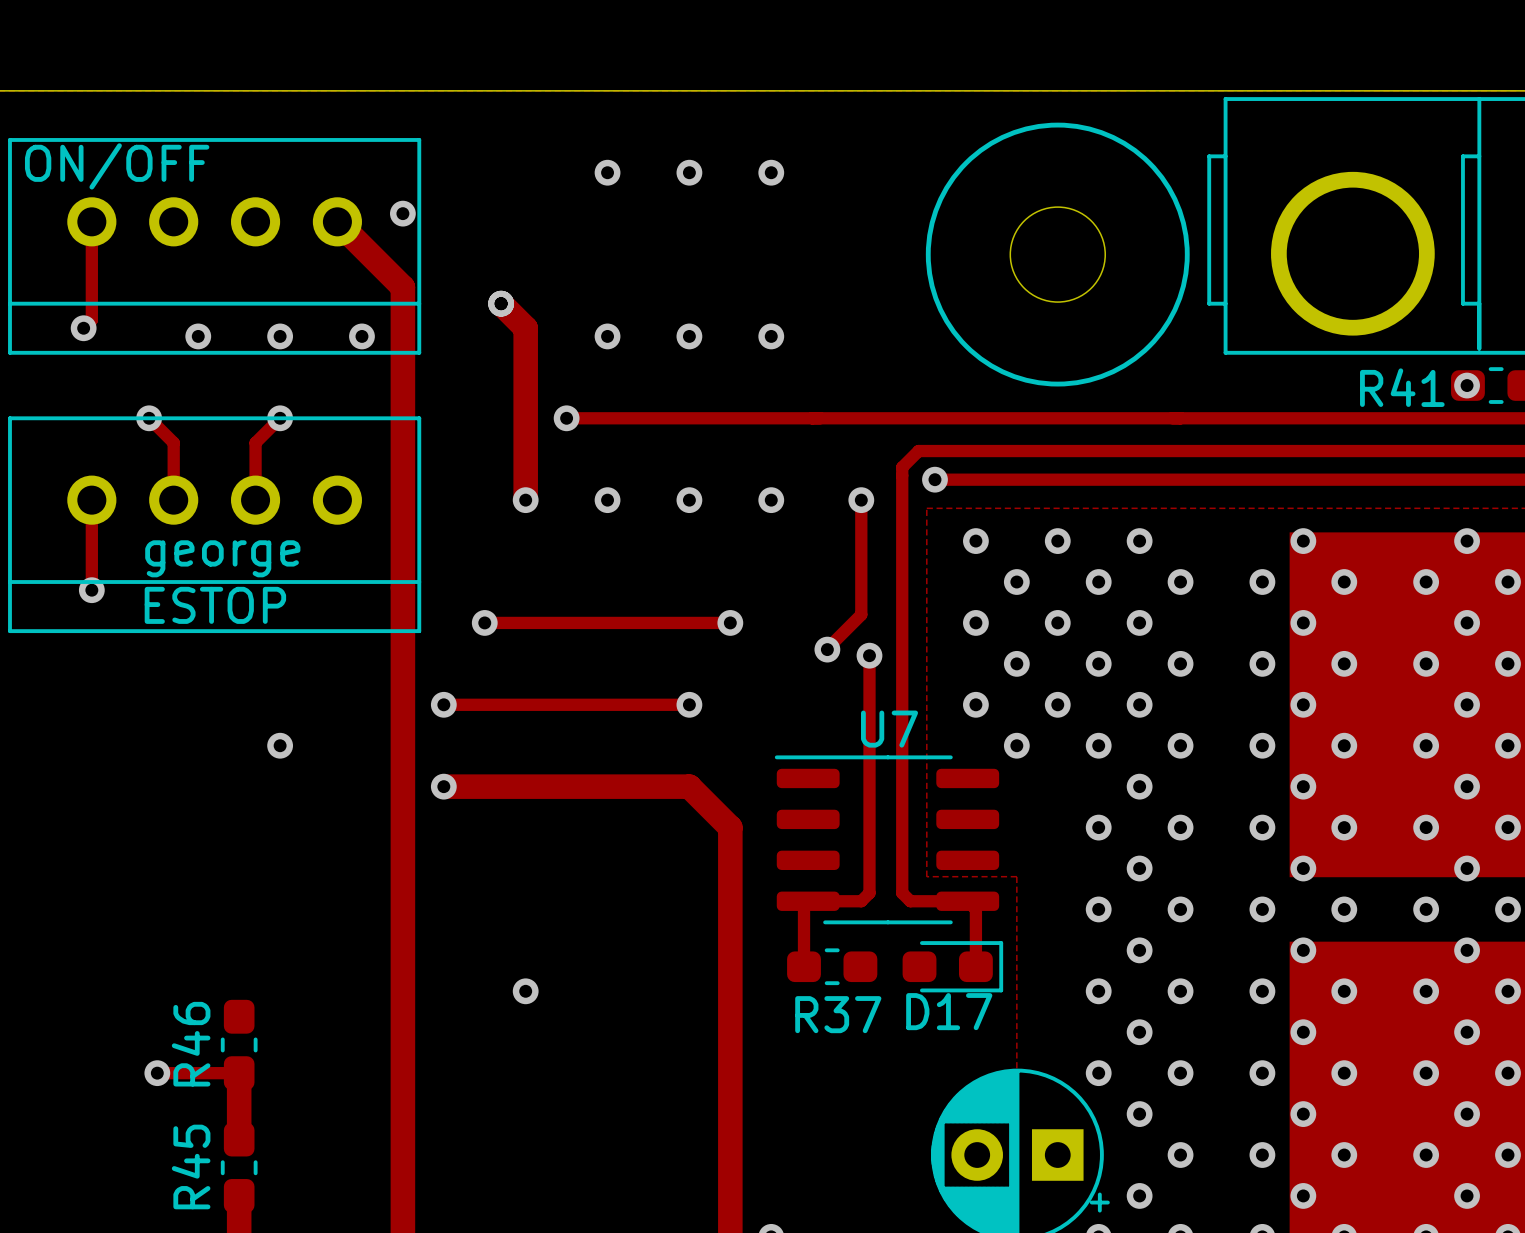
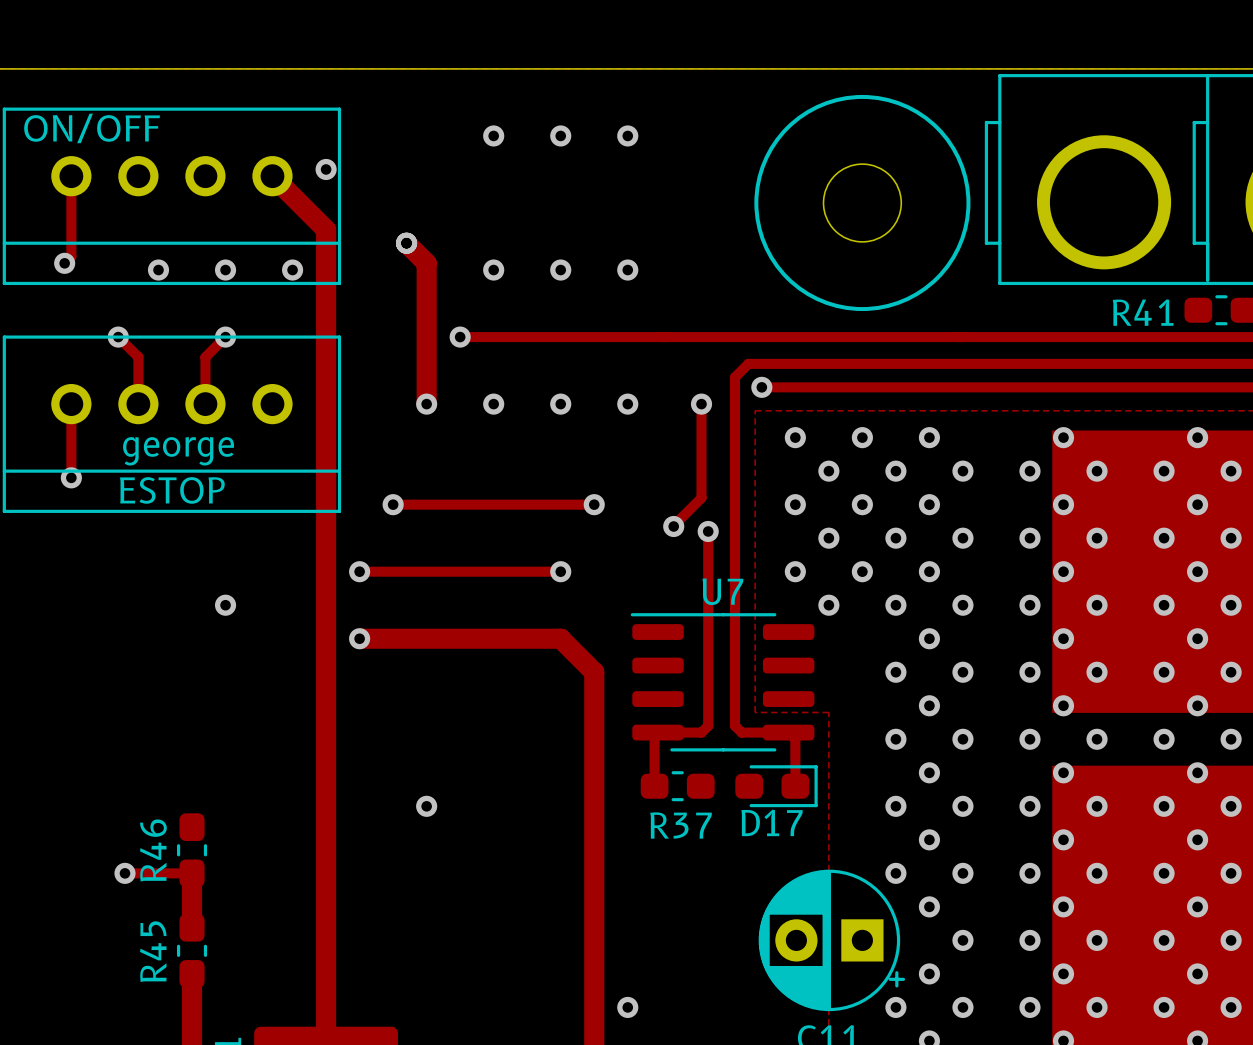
via: (1467, 385) -> none

